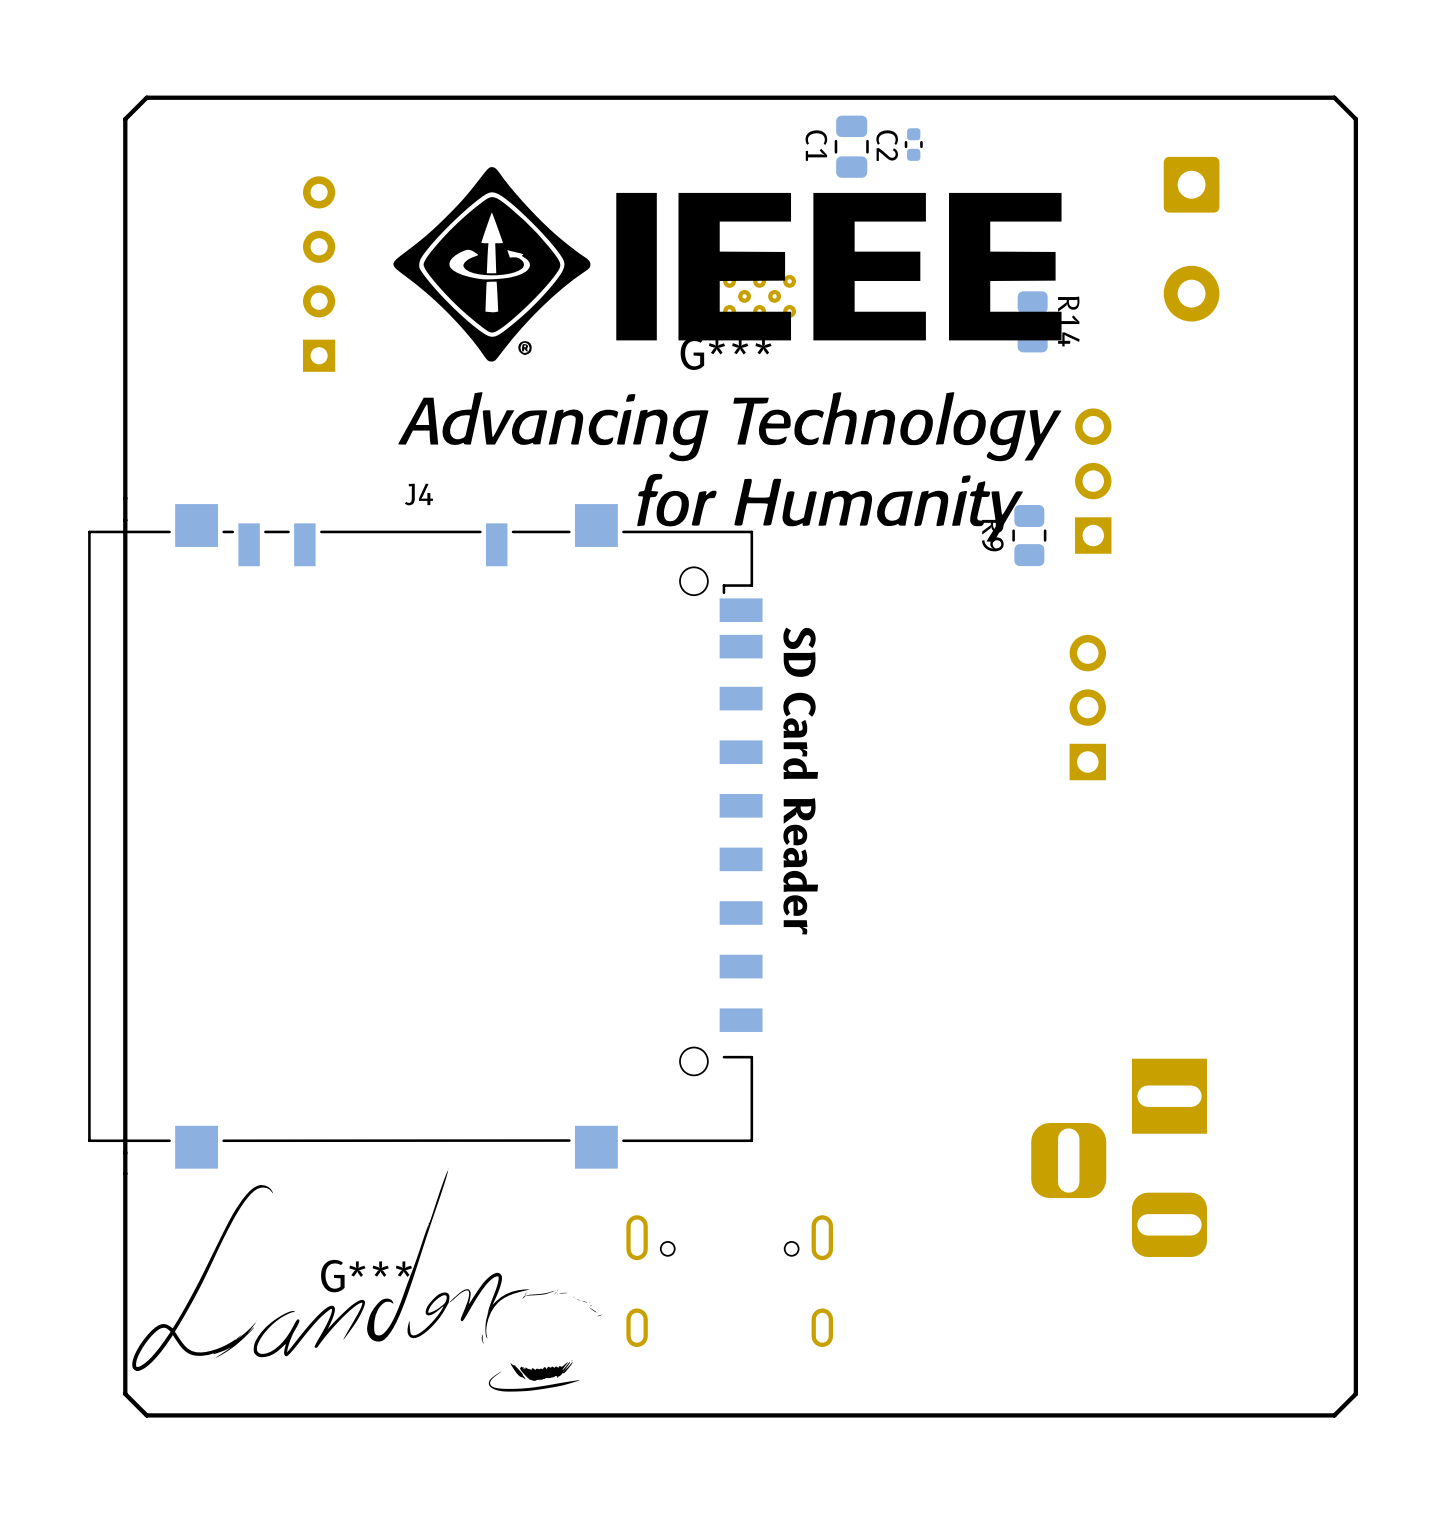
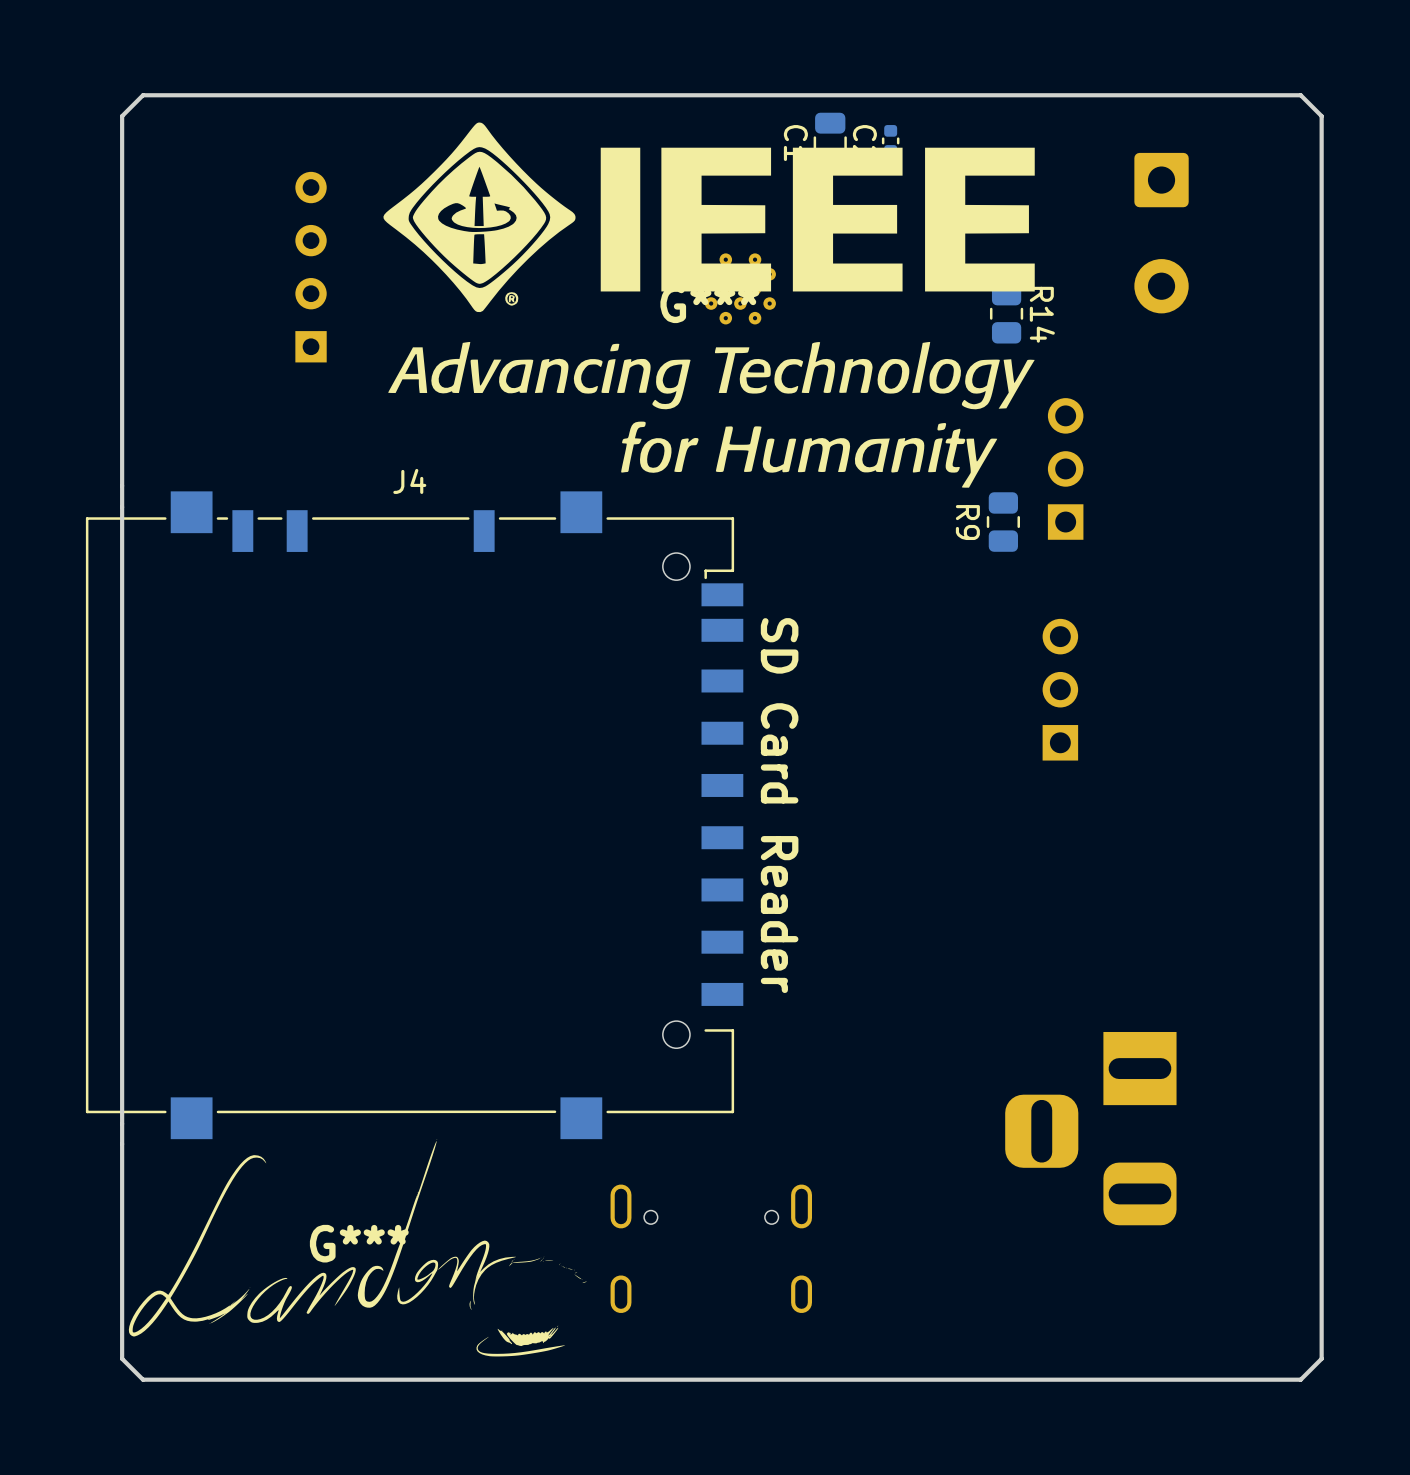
G*** position: (727, 354) -> (709, 305)

